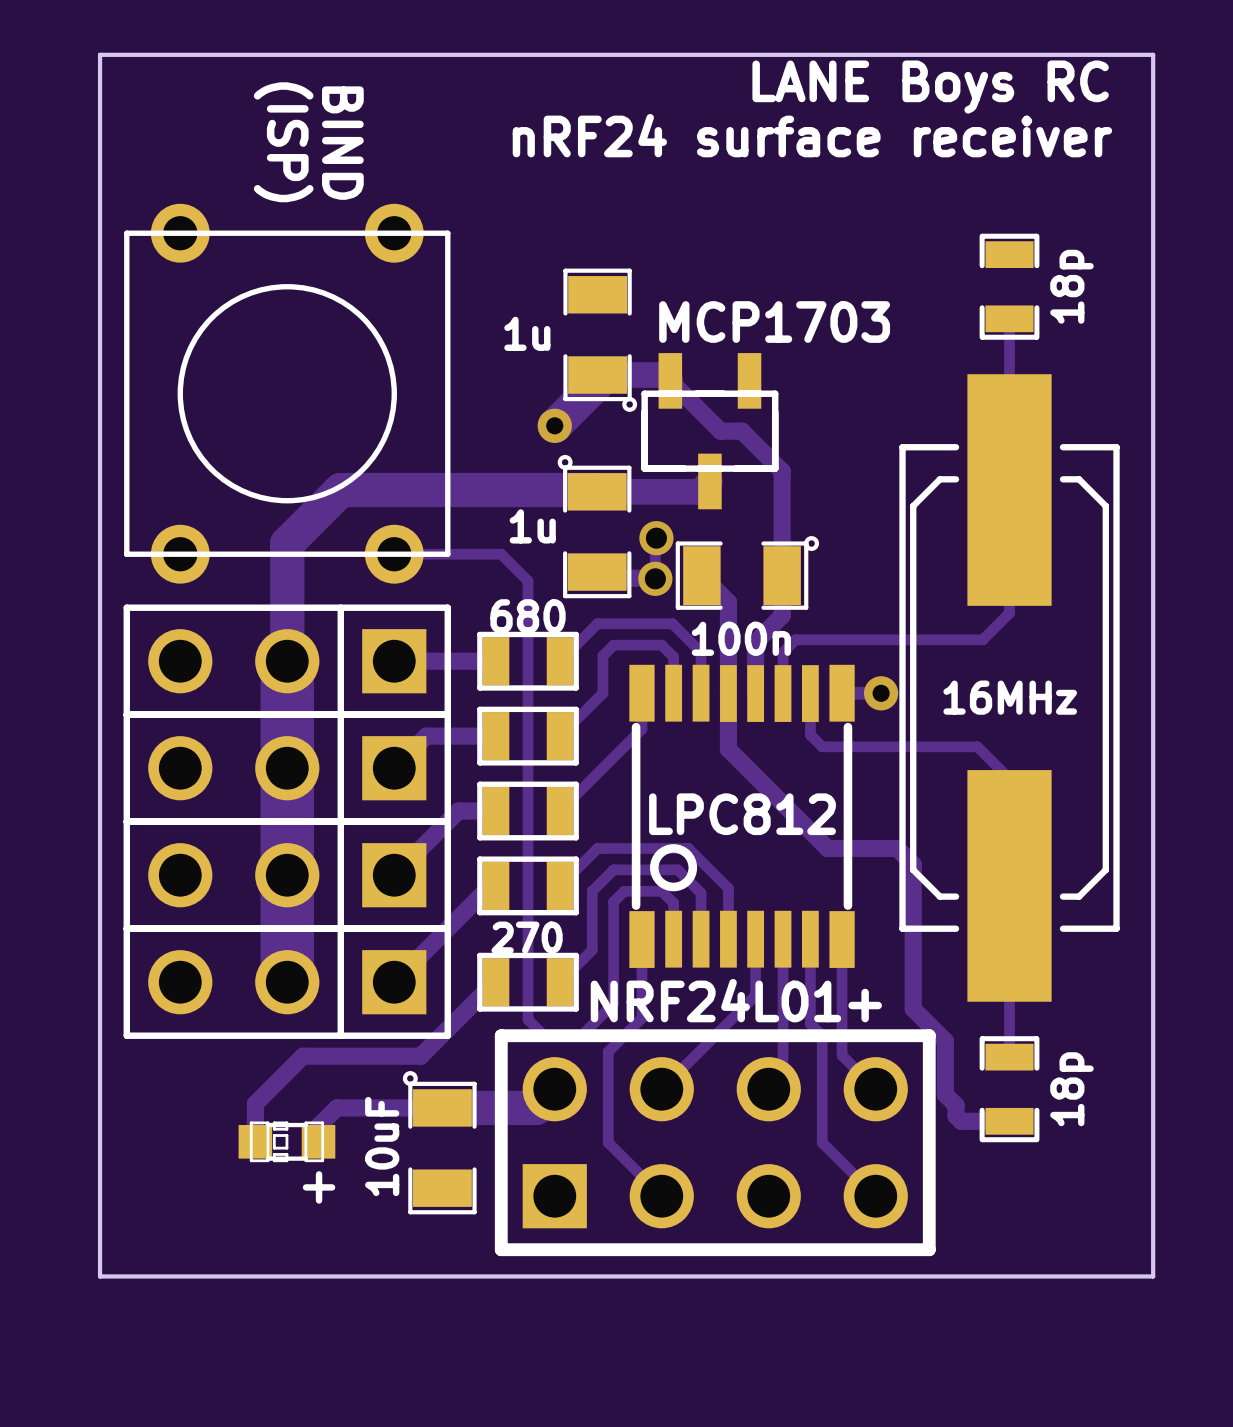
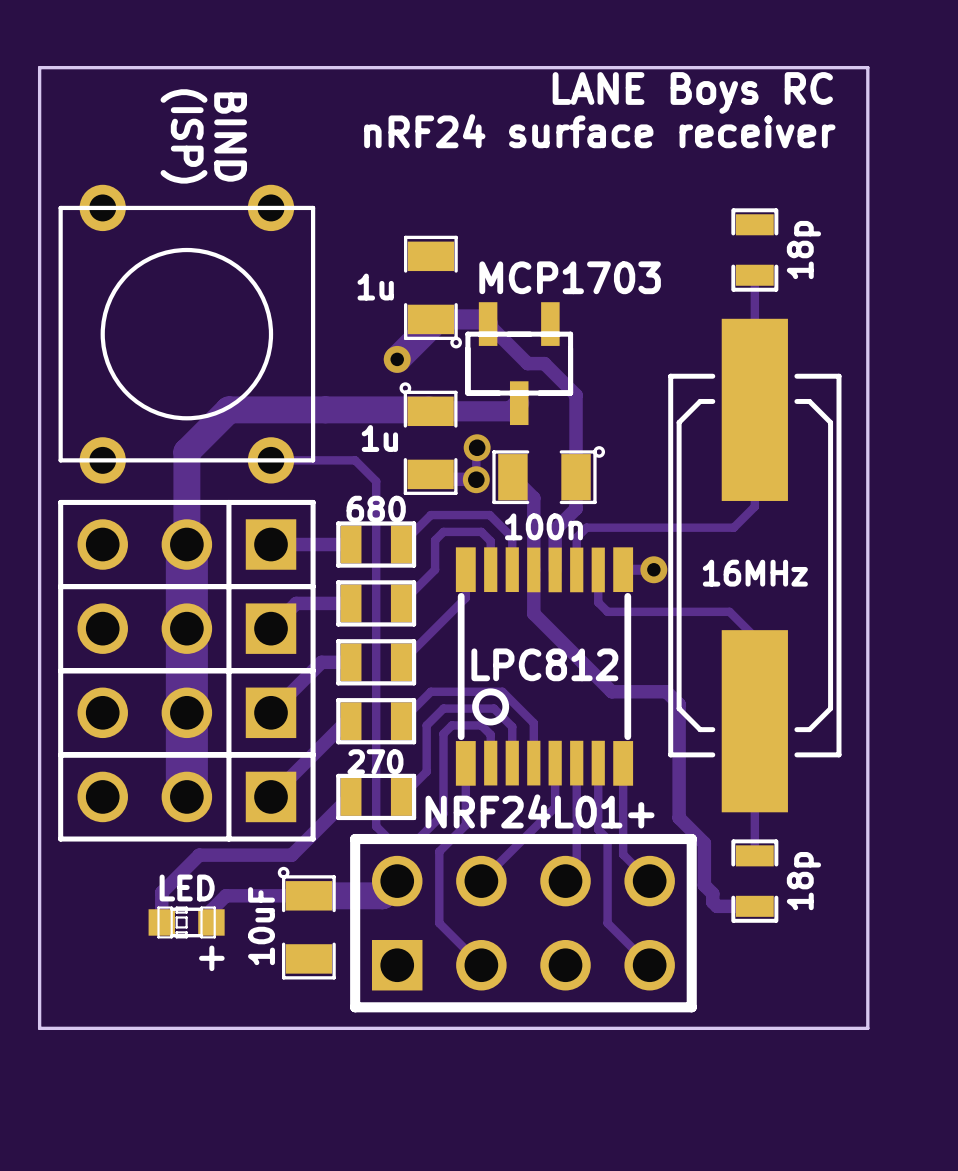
part value: none -> LED (187, 887)

